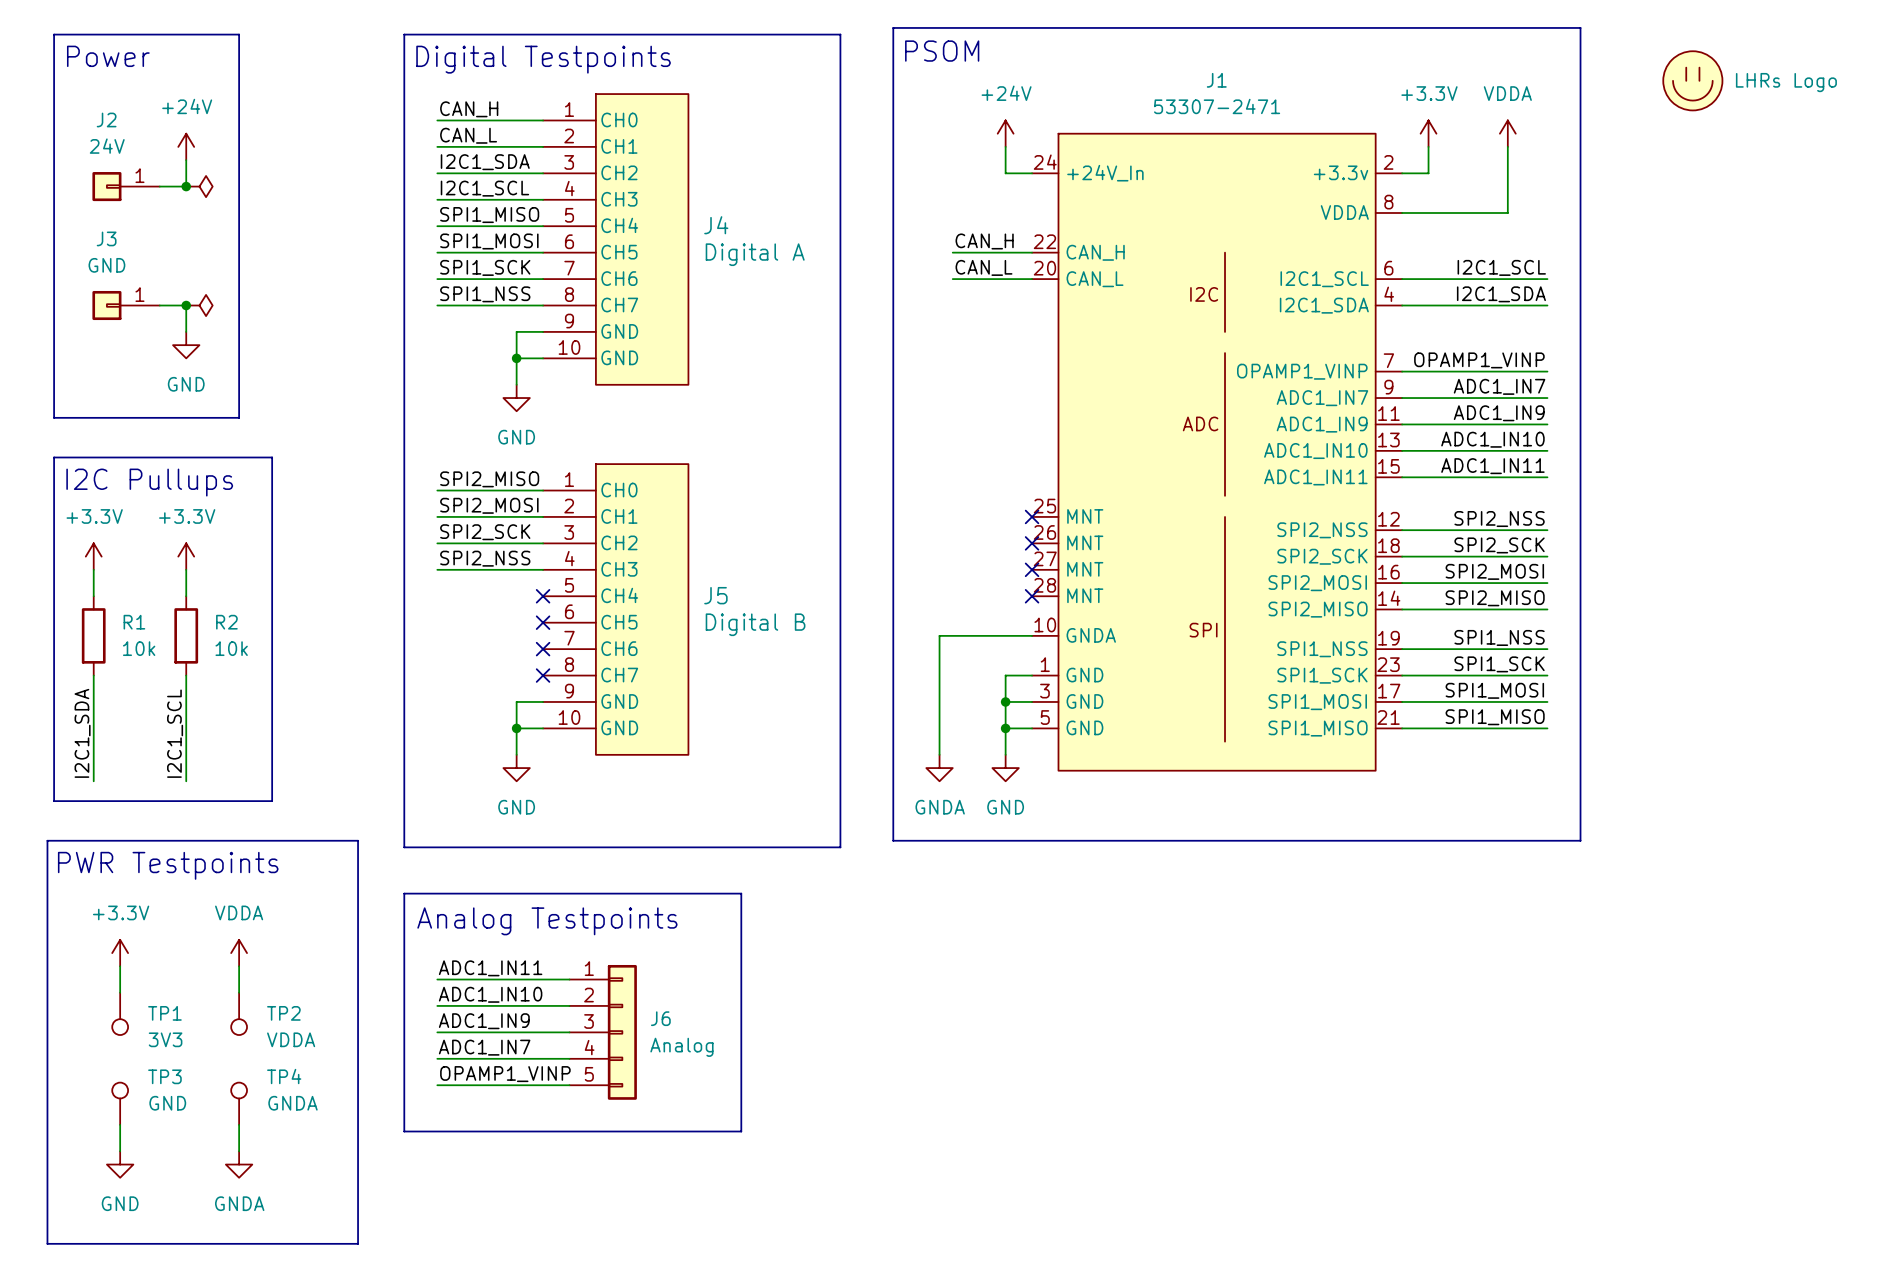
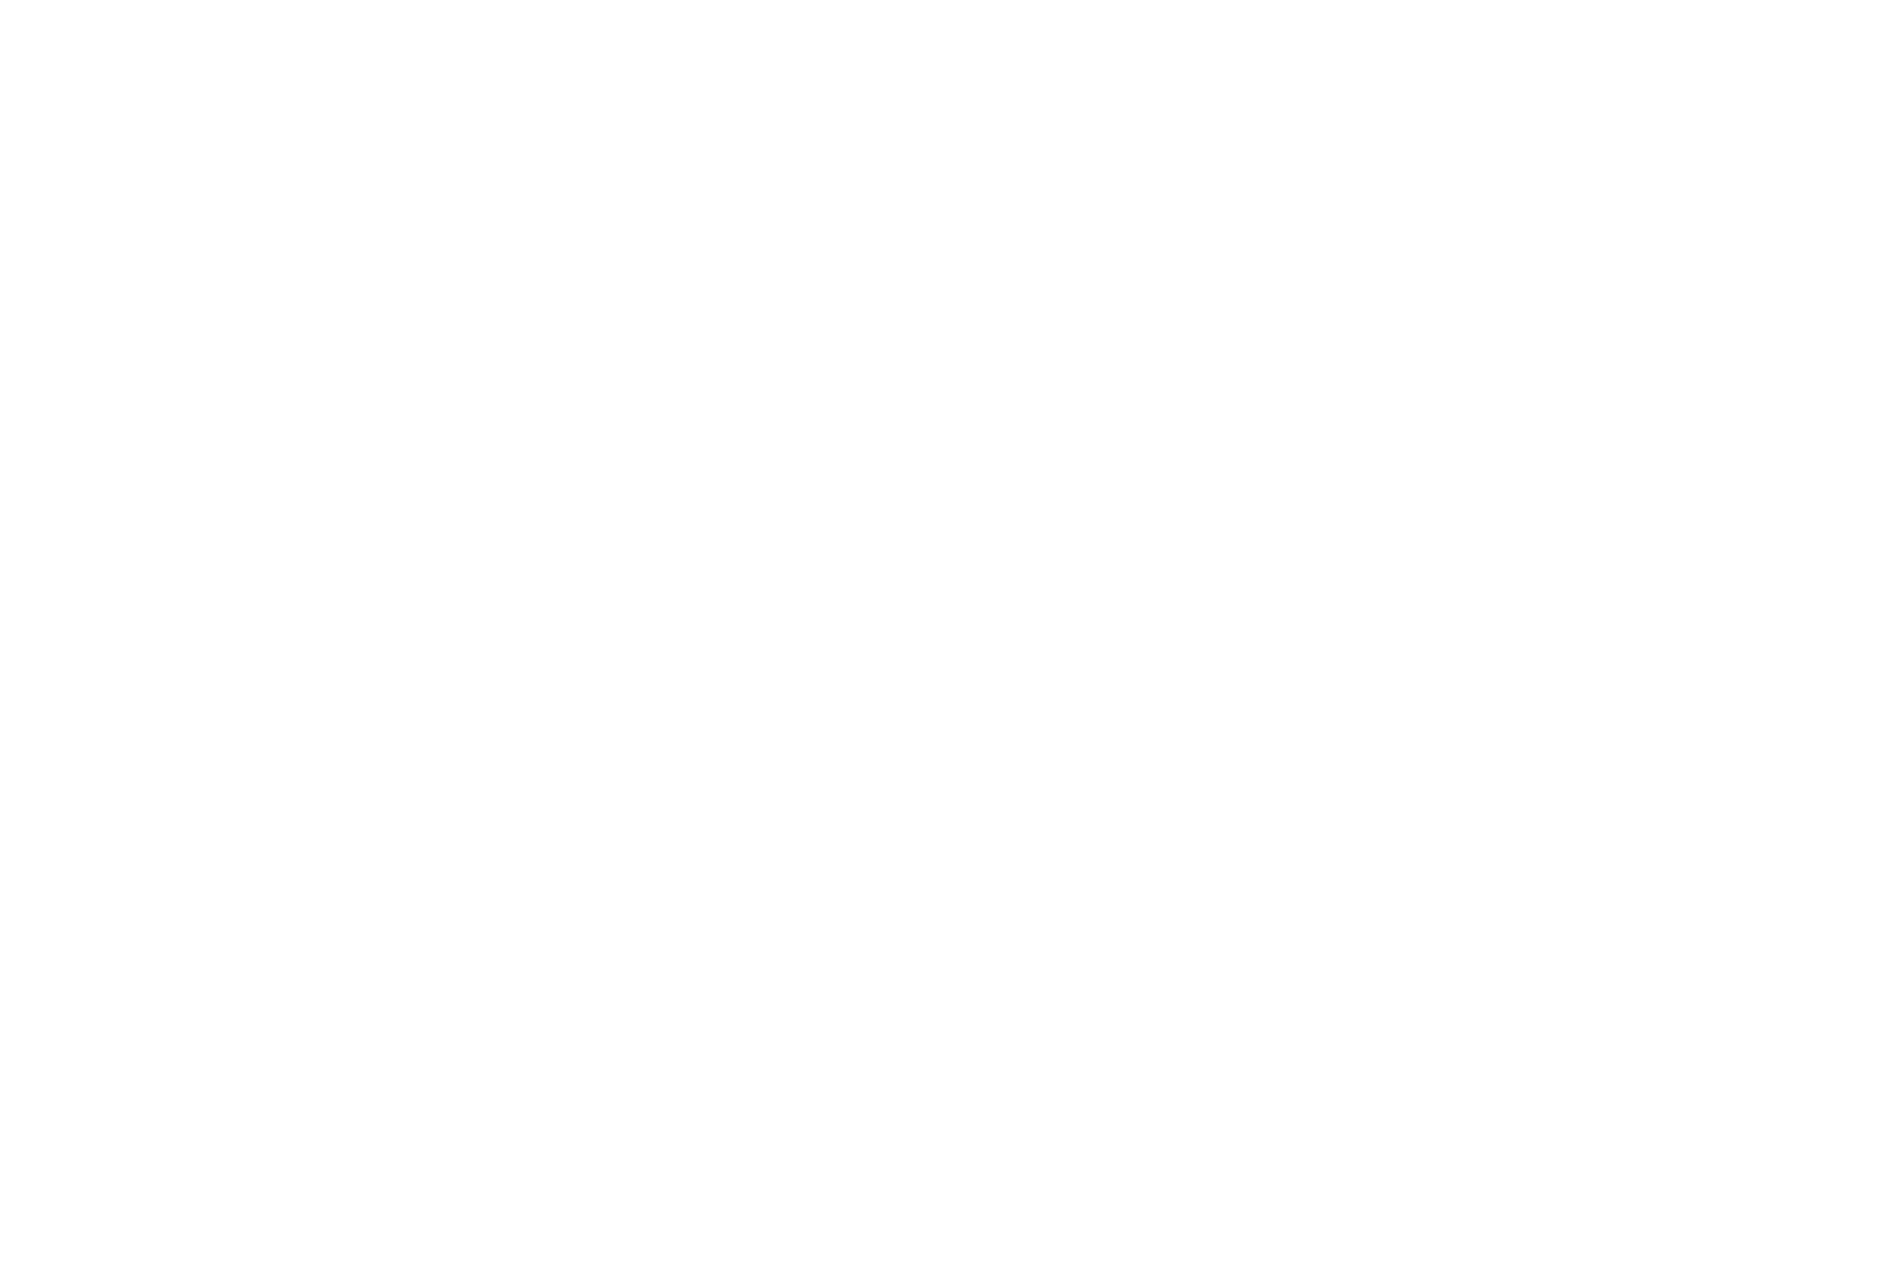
line: (893, 27) (1580, 27) (1580, 840) (893, 840) (893, 27) -> none
line: (54, 34) (239, 34) (239, 417) (54, 417) (54, 34) -> none
line: (404, 34) (840, 34) (840, 847) (404, 847) (404, 34) -> none
text: PSOM (942, 51) -> none
text: Power (108, 56) -> none
text: Digital Testpoints (543, 59) -> none
part: LHRs Logo (1692, 80) -> none
label: CAN_H (469, 109) -> none
wire: (437, 120) (543, 120) -> none
power symbol: +24V (1005, 133) -> none
power symbol: +3.3V (1428, 133) -> none
power symbol: VDDA (1507, 133) -> none
label: CAN_L (468, 135) -> none
power symbol: +24V (186, 146) -> none
wire: (437, 146) (543, 146) -> none
wire: (1005, 146) (1005, 173) (1032, 173) -> none
wire: (1428, 146) (1428, 173) (1402, 173) -> none
wire: (1507, 146) (1507, 212) (1402, 212) -> none
wire: (186, 160) (186, 186) (159, 186) -> none
label: I2C1_SDA (485, 162) -> none
wire: (437, 173) (543, 173) -> none
J2: 24V (126, 186) -> none
junction: (186, 186) -> none
power symbol: (199, 186) -> none
label: I2C1_SCL (484, 188) -> none
wire: (437, 199) (543, 199) -> none
label: SPI1_MISO (489, 215) -> none
wire: (437, 226) (543, 226) -> none
J4: Digital A (615, 239) -> none
label: SPI1_MOSI (489, 241) -> none
label: CAN_H (984, 241) -> none
wire: (437, 252) (543, 252) -> none
wire: (952, 252) (1032, 252) -> none
label: SPI1_SCK (485, 267) -> none
label: CAN_L (984, 267) -> none
label: I2C1_SCL (1501, 267) -> none
wire: (437, 279) (543, 279) -> none
wire: (952, 279) (1032, 279) -> none
wire: (1402, 279) (1547, 279) -> none
label: SPI1_NSS (485, 294) -> none
label: I2C1_SDA (1501, 294) -> none
J3: GND (126, 305) -> none
wire: (159, 305) (186, 305) (186, 331) -> none
junction: (186, 305) -> none
power symbol: (199, 305) -> none
wire: (437, 305) (543, 305) -> none
wire: (1402, 305) (1547, 305) -> none
wire: (543, 331) (516, 331) (516, 384) -> none
power symbol: GND (186, 345) -> none
wire: (516, 358) (543, 358) -> none
junction: (516, 358) -> none
label: OPAMP1_VINP (1479, 360) -> none
wire: (1402, 371) (1547, 371) -> none
label: ADC1_IN7 (1499, 386) -> none
power symbol: GND (516, 398) -> none
wire: (1402, 398) (1547, 398) -> none
label: ADC1_IN9 (1499, 413) -> none
wire: (1402, 424) (1547, 424) -> none
label: ADC1_IN10 (1492, 439) -> none
wire: (1402, 450) (1547, 450) -> none
J1: 53307-2471 (1217, 452) -> none
line: (54, 457) (272, 457) (272, 801) (54, 801) (54, 457) -> none
label: ADC1_IN11 (1492, 466) -> none
wire: (1402, 477) (1547, 477) -> none
label: SPI2_MISO (489, 479) -> none
text: I2C Pullups (149, 482) -> none
wire: (437, 490) (543, 490) -> none
label: SPI2_MOSI (489, 505) -> none
wire: (437, 516) (543, 516) -> none
no-connect mark: (1032, 516) -> none
label: SPI2_NSS (1499, 519) -> none
wire: (1402, 530) (1547, 530) -> none
label: SPI2_SCK (485, 532) -> none
wire: (437, 543) (543, 543) -> none
no-connect mark: (1032, 543) -> none
label: SPI2_SCK (1499, 545) -> none
power symbol: +3.3V (93, 556) -> none
power symbol: +3.3V (186, 556) -> none
wire: (1402, 556) (1547, 556) -> none
label: SPI2_NSS (485, 558) -> none
wire: (93, 569) (93, 596) -> none
wire: (186, 569) (186, 596) -> none
wire: (437, 569) (543, 569) -> none
no-connect mark: (1032, 569) -> none
label: SPI2_MOSI (1494, 571) -> none
wire: (1402, 583) (1547, 583) -> none
no-connect mark: (543, 596) -> none
no-connect mark: (1032, 596) -> none
label: SPI2_MISO (1495, 598) -> none
J5: Digital B (615, 609) -> none
wire: (1402, 609) (1547, 609) -> none
no-connect mark: (543, 622) -> none
R1: 10k (93, 635) -> none
R2: 10k (186, 635) -> none
wire: (1032, 635) (939, 635) (939, 754) -> none
label: SPI1_NSS (1499, 637) -> none
no-connect mark: (543, 649) -> none
wire: (1402, 649) (1547, 649) -> none
label: SPI1_SCK (1499, 664) -> none
wire: (93, 675) (93, 781) -> none
wire: (186, 675) (186, 781) -> none
no-connect mark: (543, 675) -> none
wire: (1032, 675) (1005, 675) (1005, 754) -> none
wire: (1402, 675) (1547, 675) -> none
label: SPI1_MOSI (1494, 690) -> none
wire: (543, 701) (516, 701) (516, 754) -> none
wire: (1005, 701) (1032, 701) -> none
junction: (1005, 701) -> none
wire: (1402, 701) (1547, 701) -> none
label: SPI1_MISO (1495, 717) -> none
wire: (516, 728) (543, 728) -> none
junction: (516, 728) -> none
wire: (1005, 728) (1032, 728) -> none
junction: (1005, 728) -> none
wire: (1402, 728) (1547, 728) -> none
label: I2C1_SDA (82, 733) -> none
label: I2C1_SCL (175, 733) -> none
power symbol: GND (516, 768) -> none
power symbol: GNDA (939, 768) -> none
power symbol: GND (1005, 768) -> none
line: (47, 840) (358, 840) (358, 1243) (47, 1243) (47, 840) -> none
text: PWR Testpoints (168, 865) -> none
line: (404, 893) (404, 1131) (741, 1131) (741, 893) (404, 893) -> none
text: Analog Testpoints (547, 921) -> none
power symbol: +3.3V (120, 953) -> none
power symbol: VDDA (239, 953) -> none
wire: (120, 966) (120, 992) -> none
wire: (239, 966) (239, 992) -> none
label: ADC1_IN11 (490, 968) -> none
wire: (437, 979) (569, 979) -> none
label: ADC1_IN10 (490, 994) -> none
wire: (437, 1005) (569, 1005) -> none
TP1: 3V3 (120, 1013) -> none
TP2: VDDA (239, 1013) -> none
label: ADC1_IN9 (484, 1021) -> none
wire: (437, 1032) (569, 1032) -> none
J6: Analog (603, 1032) -> none
label: ADC1_IN7 (484, 1047) -> none
wire: (437, 1058) (569, 1058) -> none
label: OPAMP1_VINP (505, 1074) -> none
wire: (437, 1085) (569, 1085) -> none
TP3: GND (120, 1103) -> none
TP4: GNDA (239, 1103) -> none
wire: (120, 1124) (120, 1151) -> none
wire: (239, 1124) (239, 1151) -> none
power symbol: GND (120, 1164) -> none
power symbol: GNDA (239, 1164) -> none

